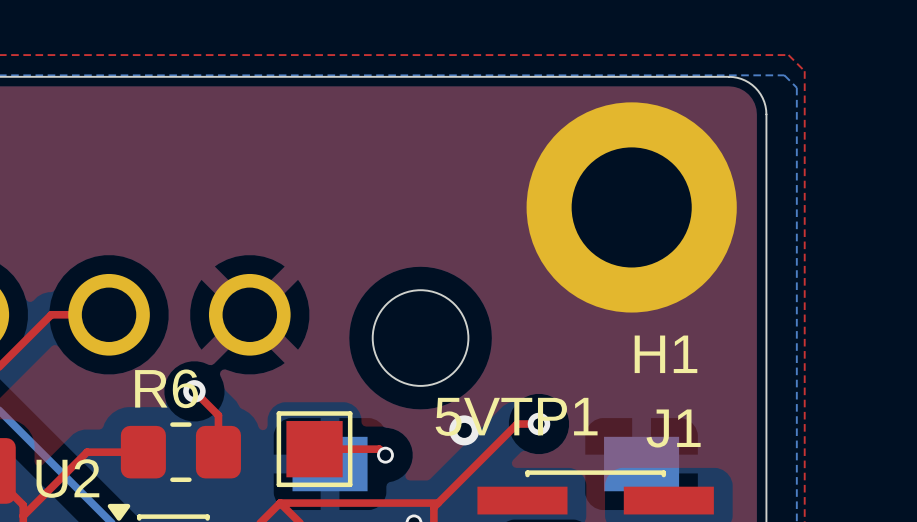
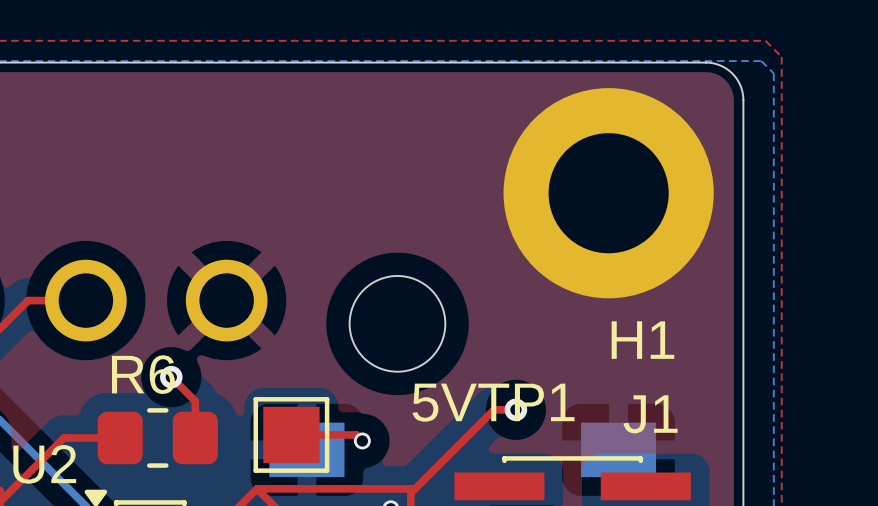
via: (464, 430) -> none

